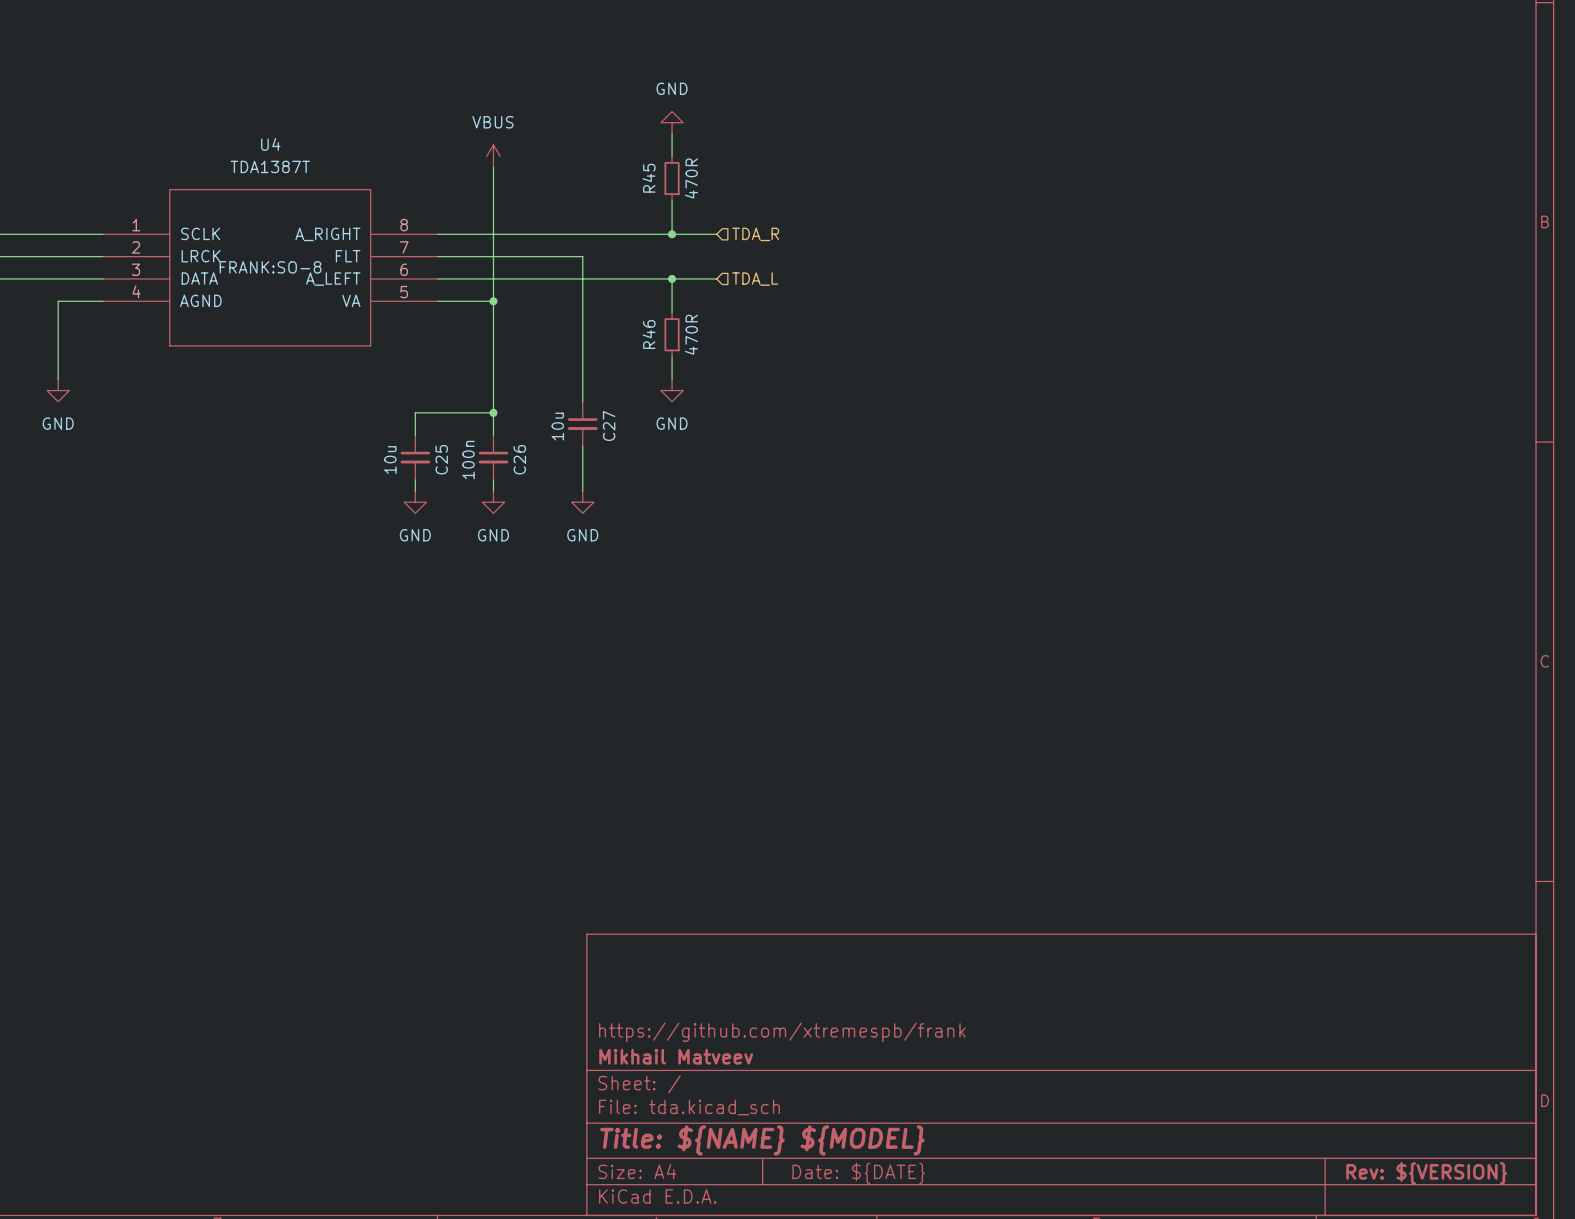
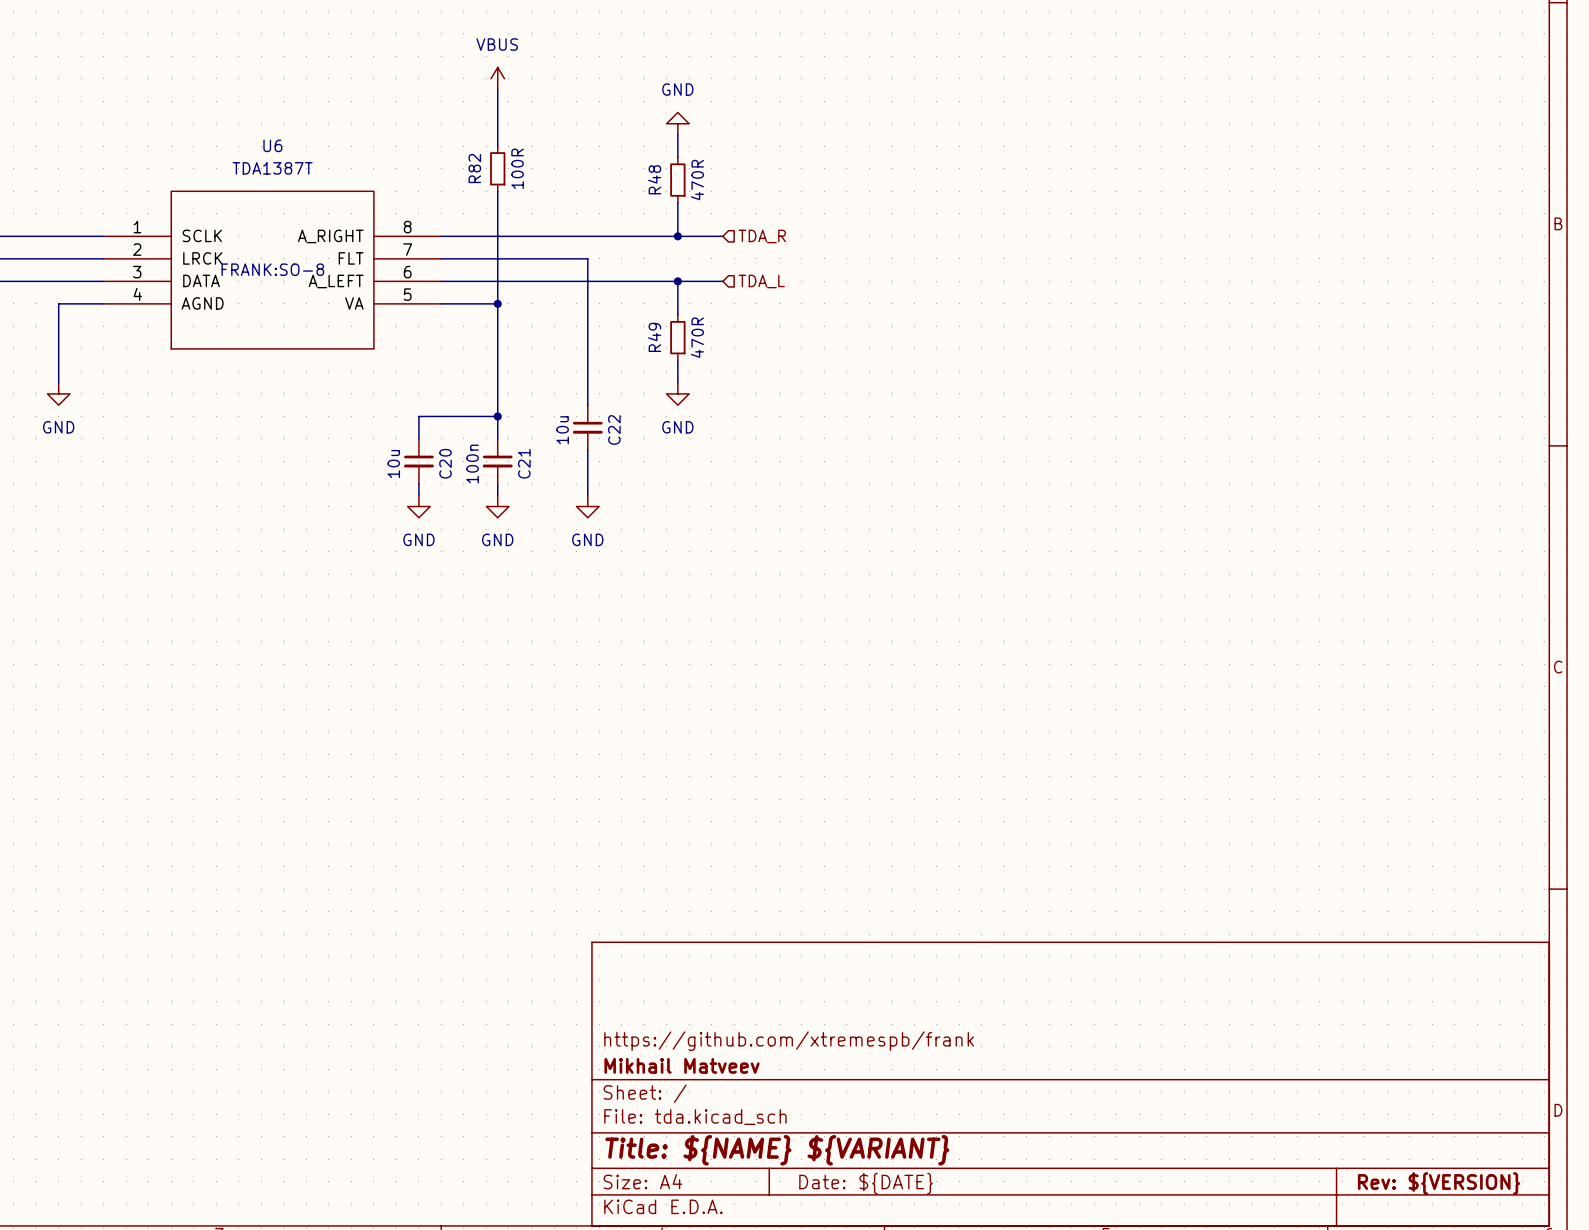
wire: none -> (497, 89) (497, 146)
U4 name: U4 (270, 144) -> U6 (272, 145)
power symbol position: VBUS (493, 156) -> VBUS (497, 78)
wire: (493, 167) (493, 189) -> none
R82: none -> 100R (497, 168)
R45 name: R45 (649, 178) -> R48 (654, 179)
R46 name: R46 (649, 334) -> R49 (654, 337)
C27 name: C27 (609, 426) -> C22 (614, 429)
C25 name: C25 (441, 459) -> C20 (445, 463)
C26 name: C26 (519, 459) -> C21 (524, 463)
title block: Title: ${NAME} ${MODEL} (762, 1140) -> Title: ${NAME} ${VARIANT} (777, 1150)

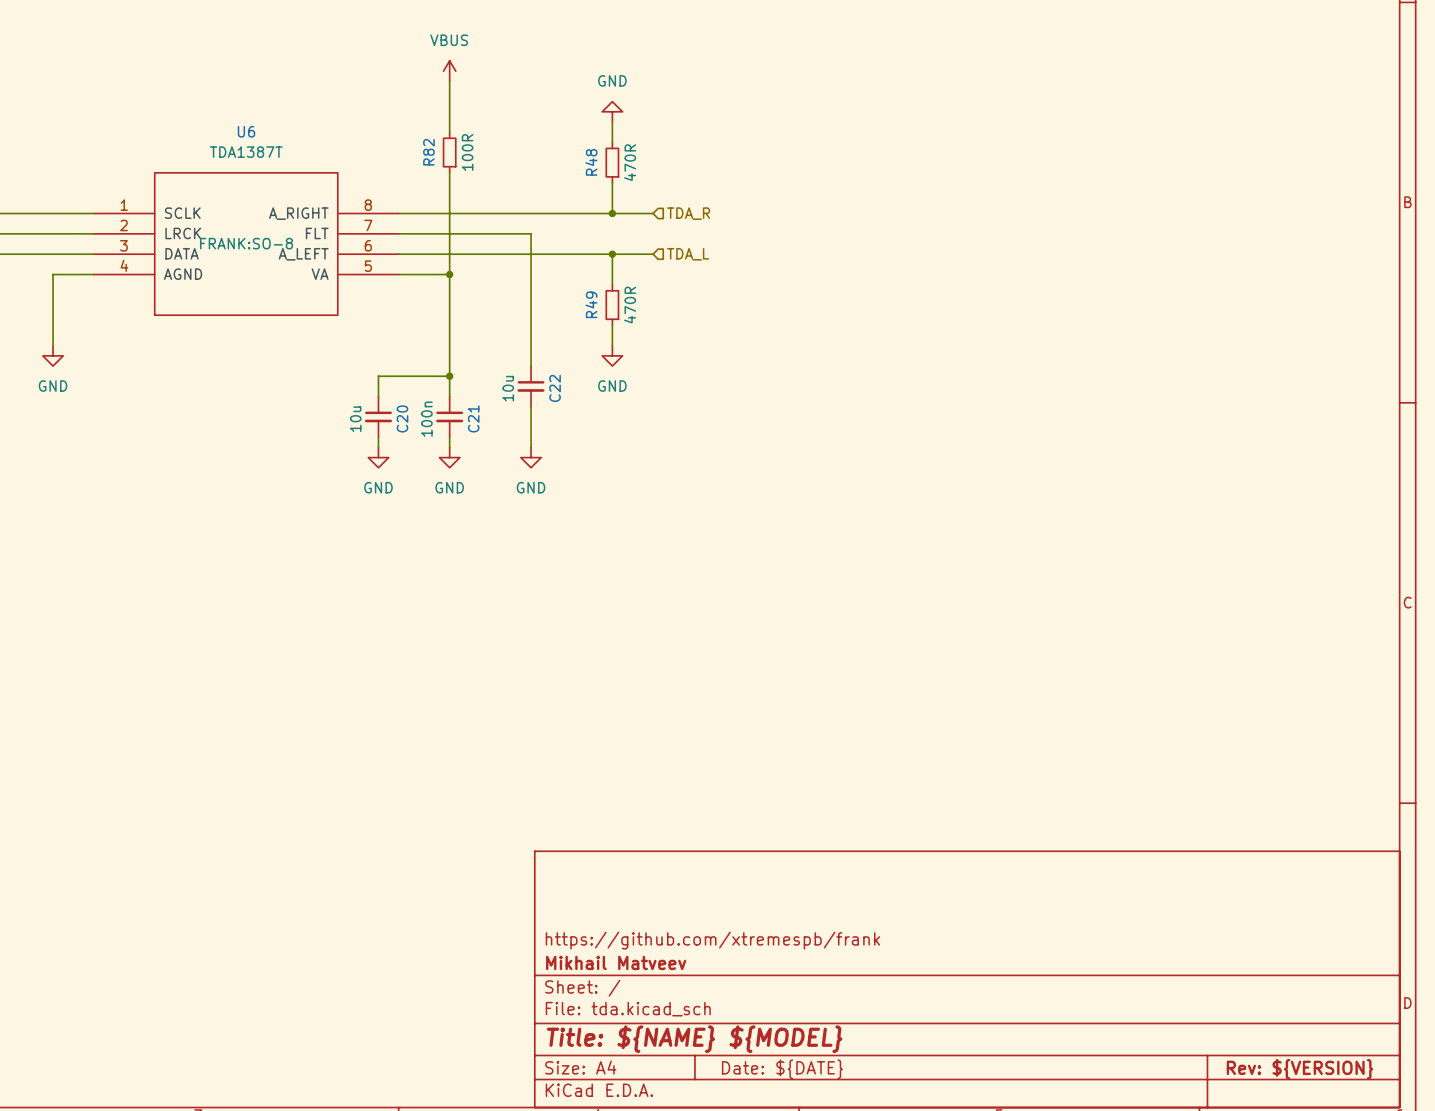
title block: Title: ${NAME} ${VARIANT} (777, 1150) -> Title: ${NAME} ${MODEL} (694, 1039)

